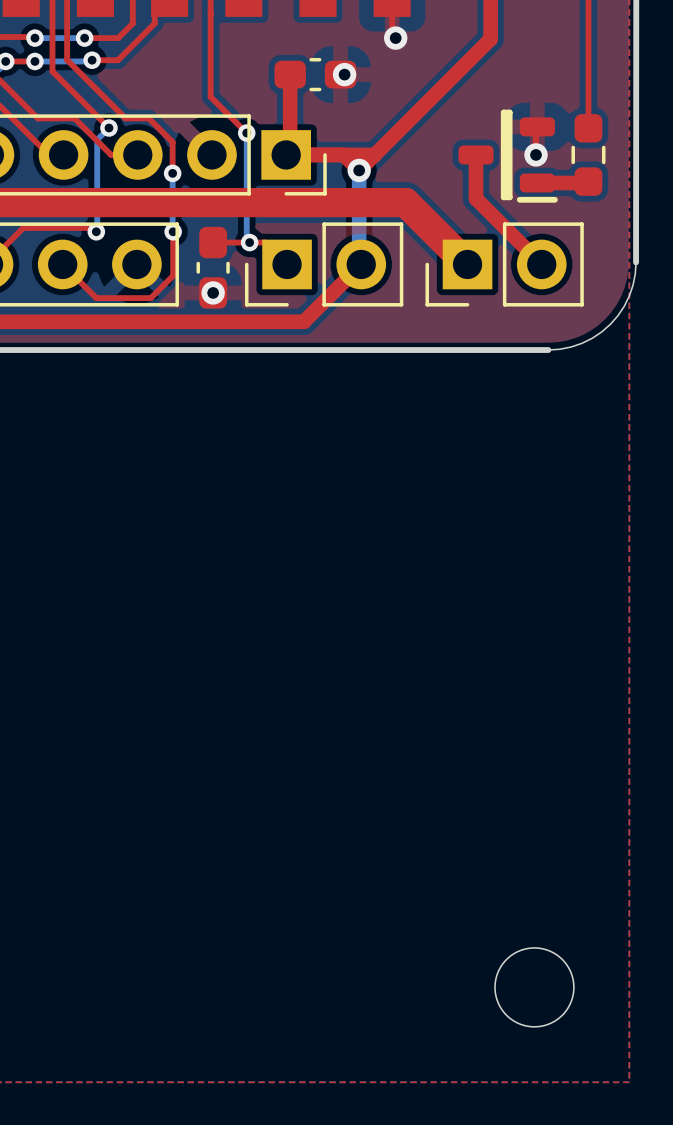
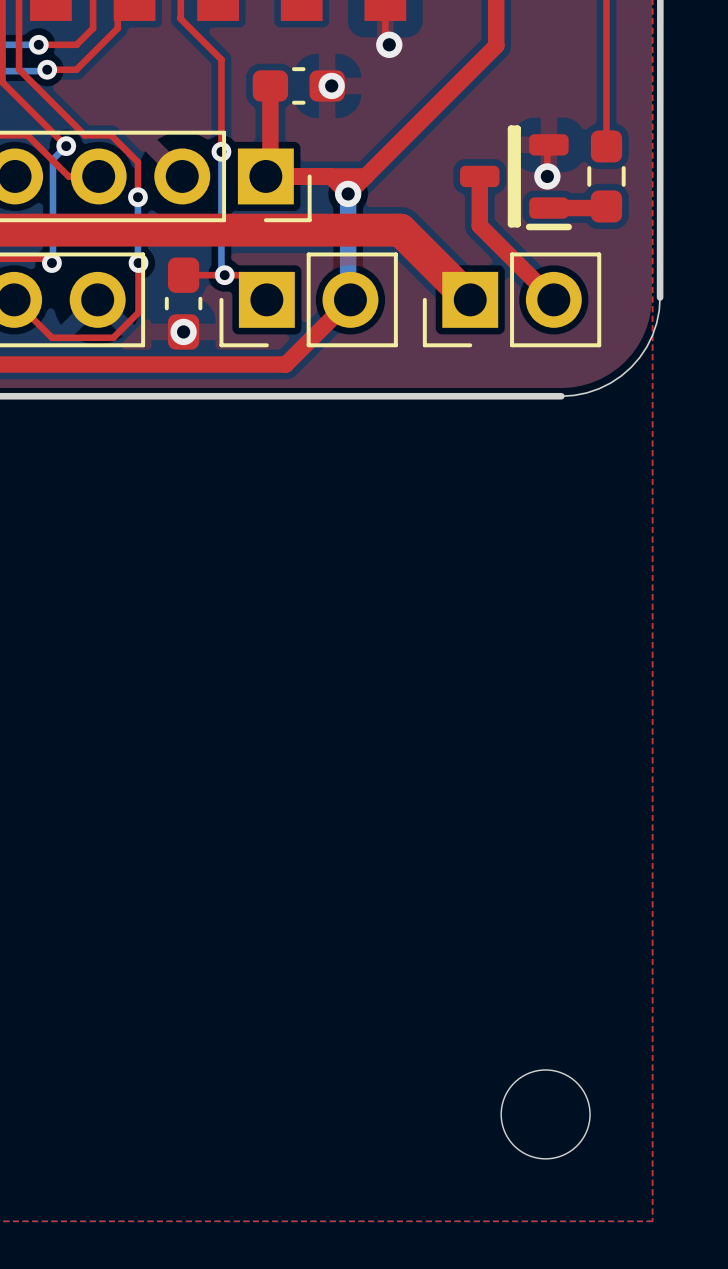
top track: (210, 15) (210, 96) (246, 133) -> (180, 18) (221, 59) (221, 151)

